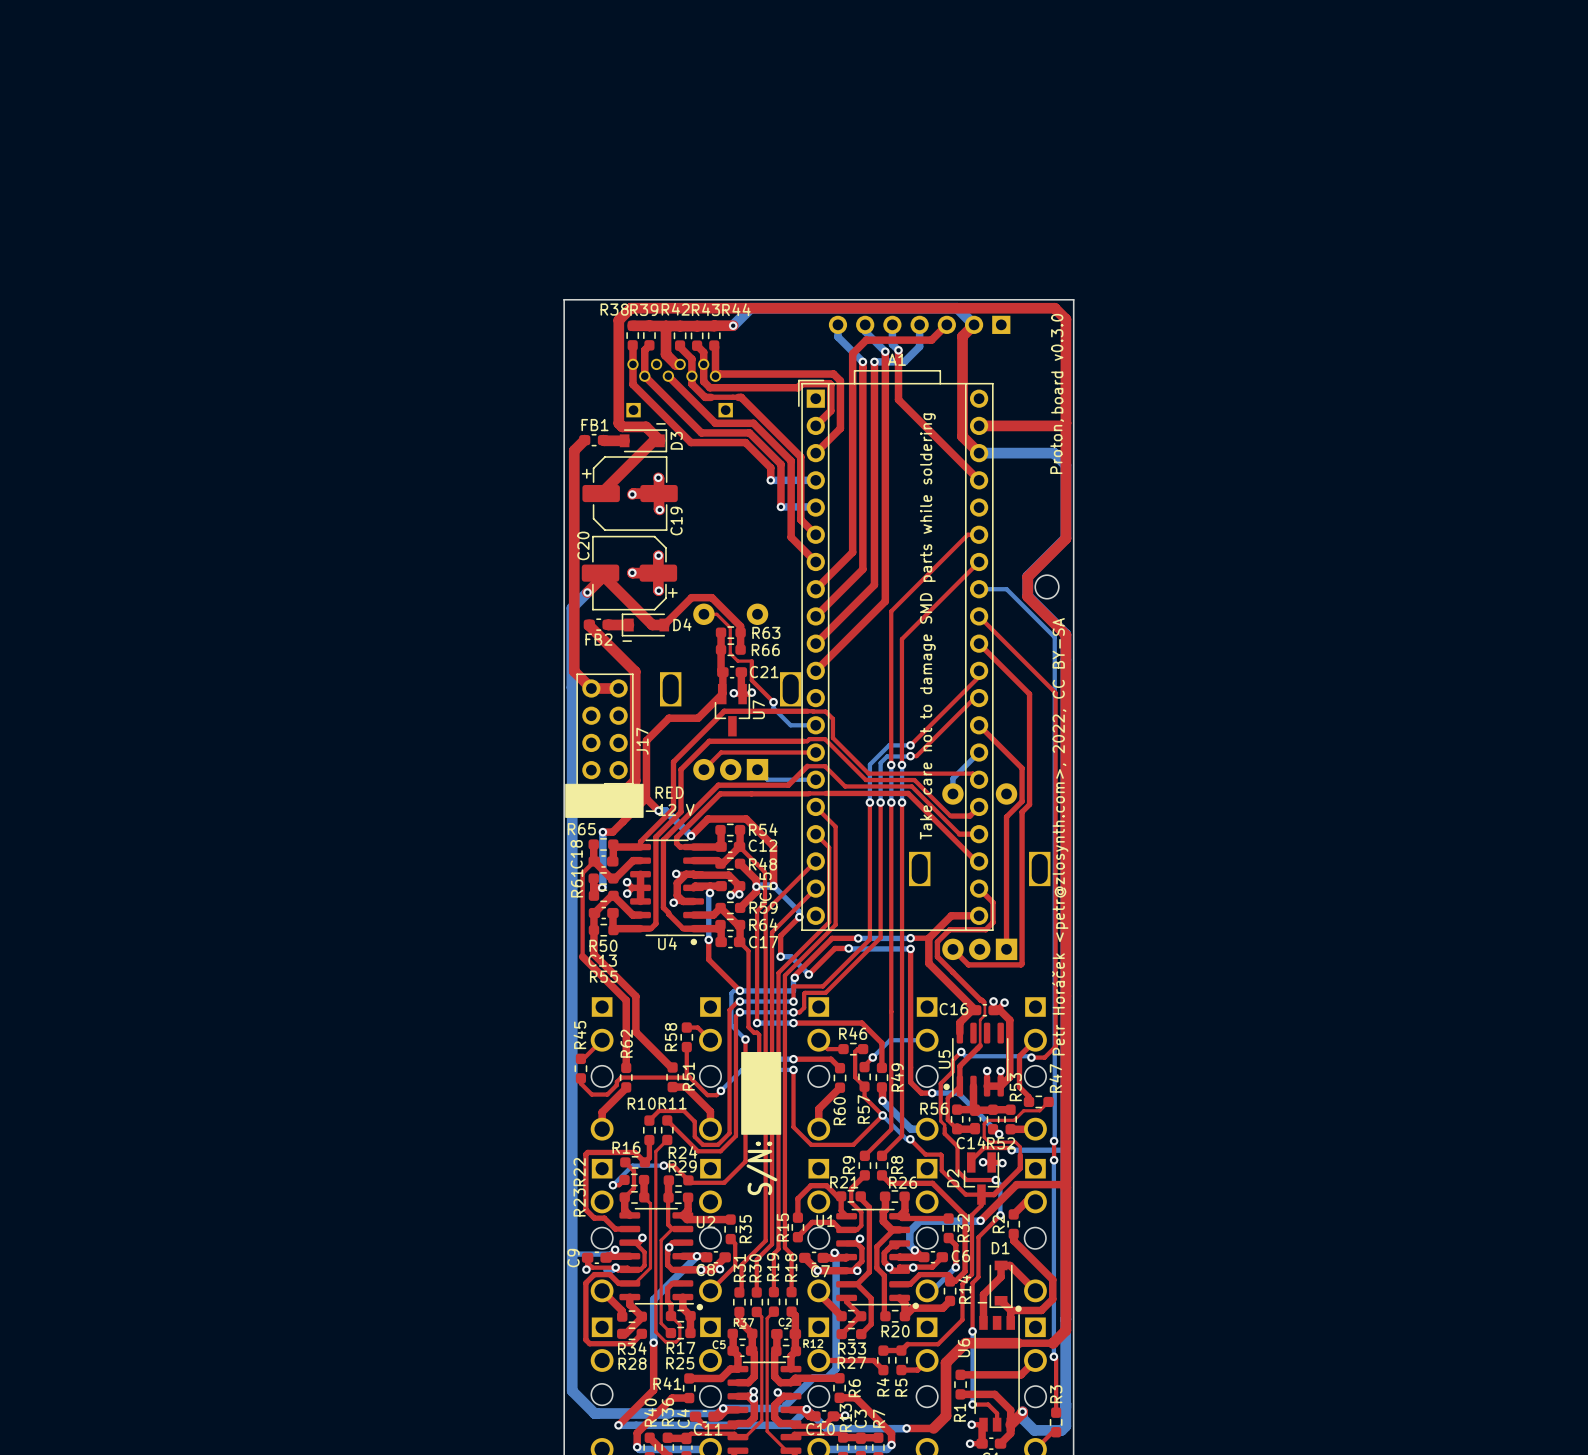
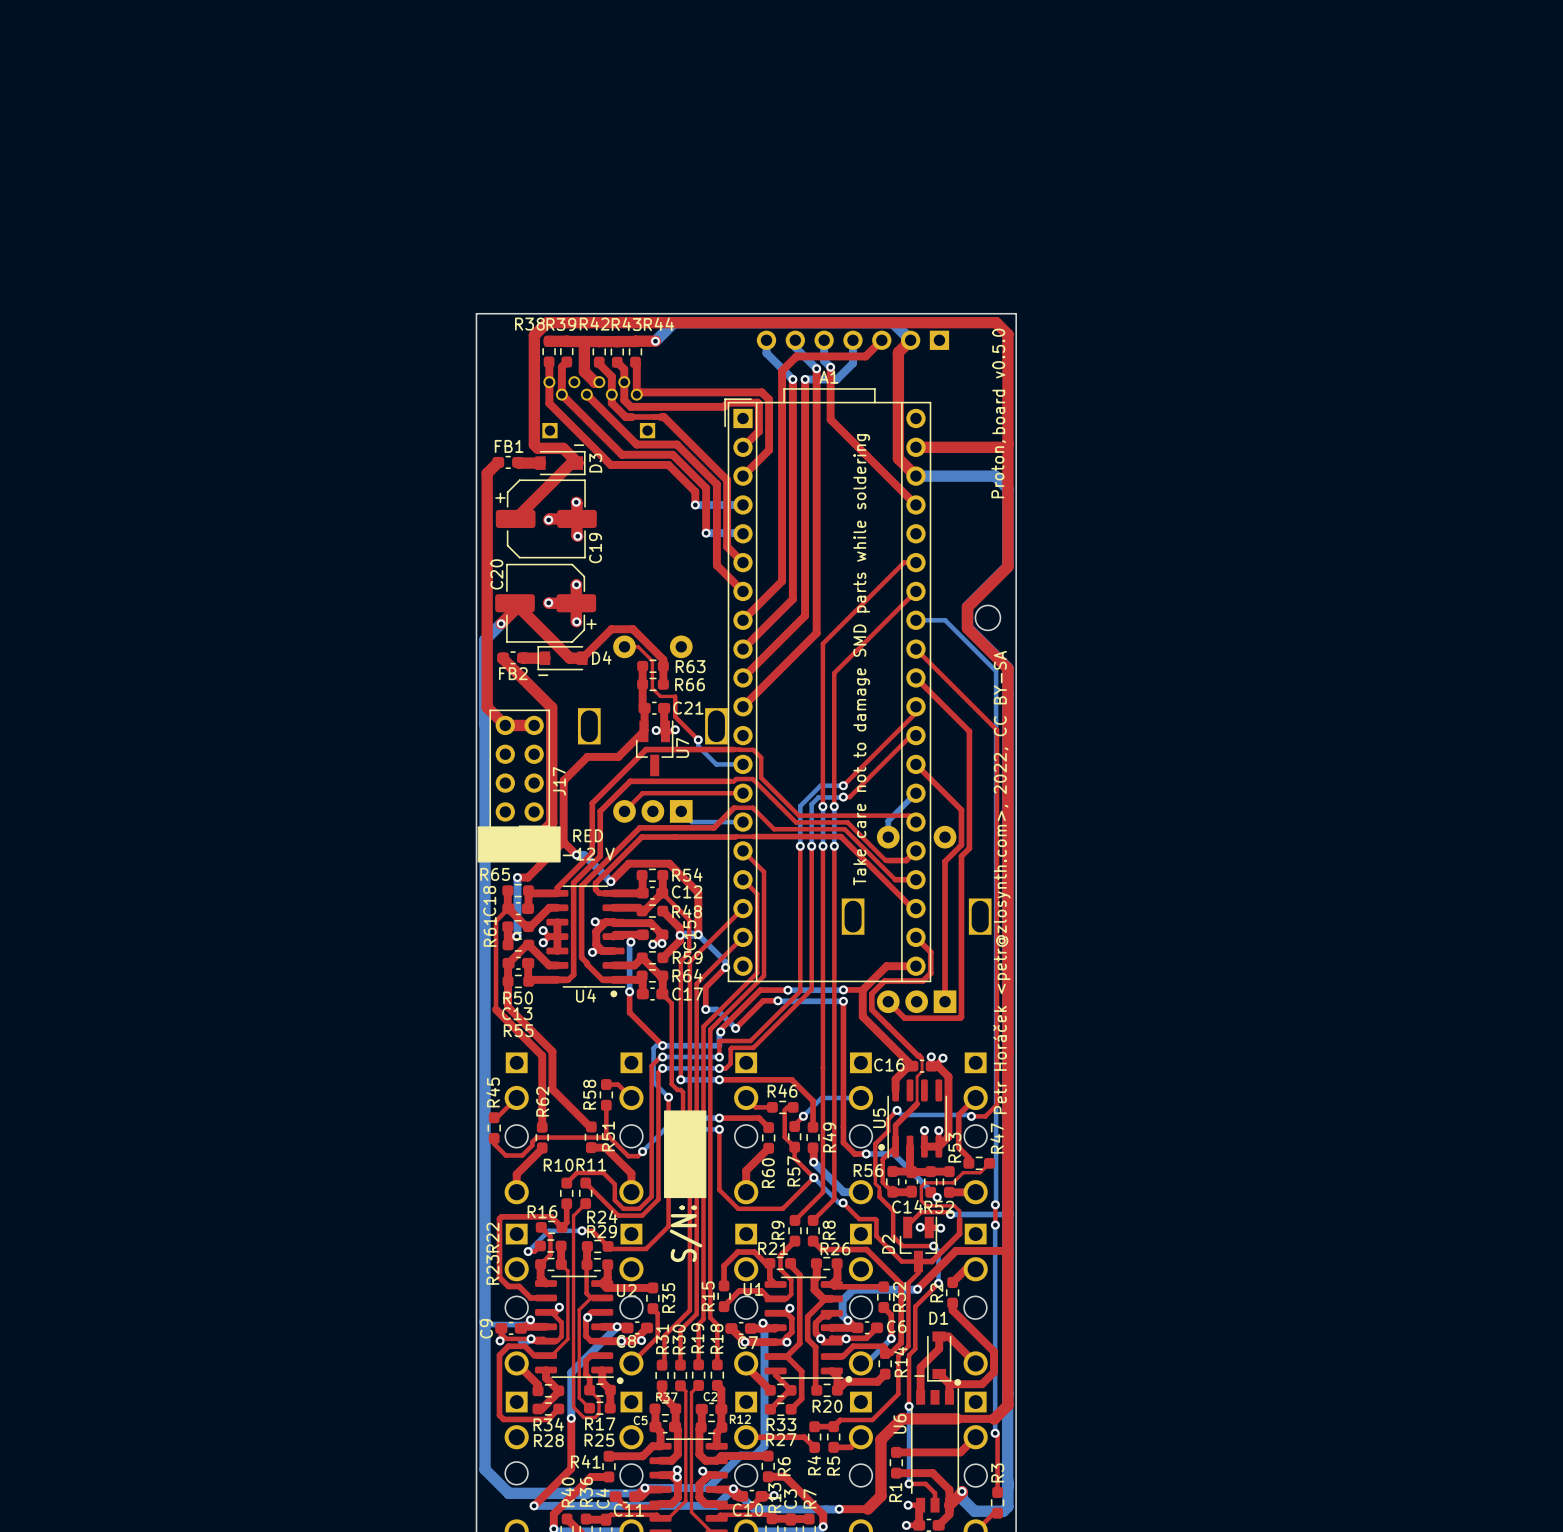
text: board v0.3.0 (1057, 363) -> board v0.5.0 (998, 381)

